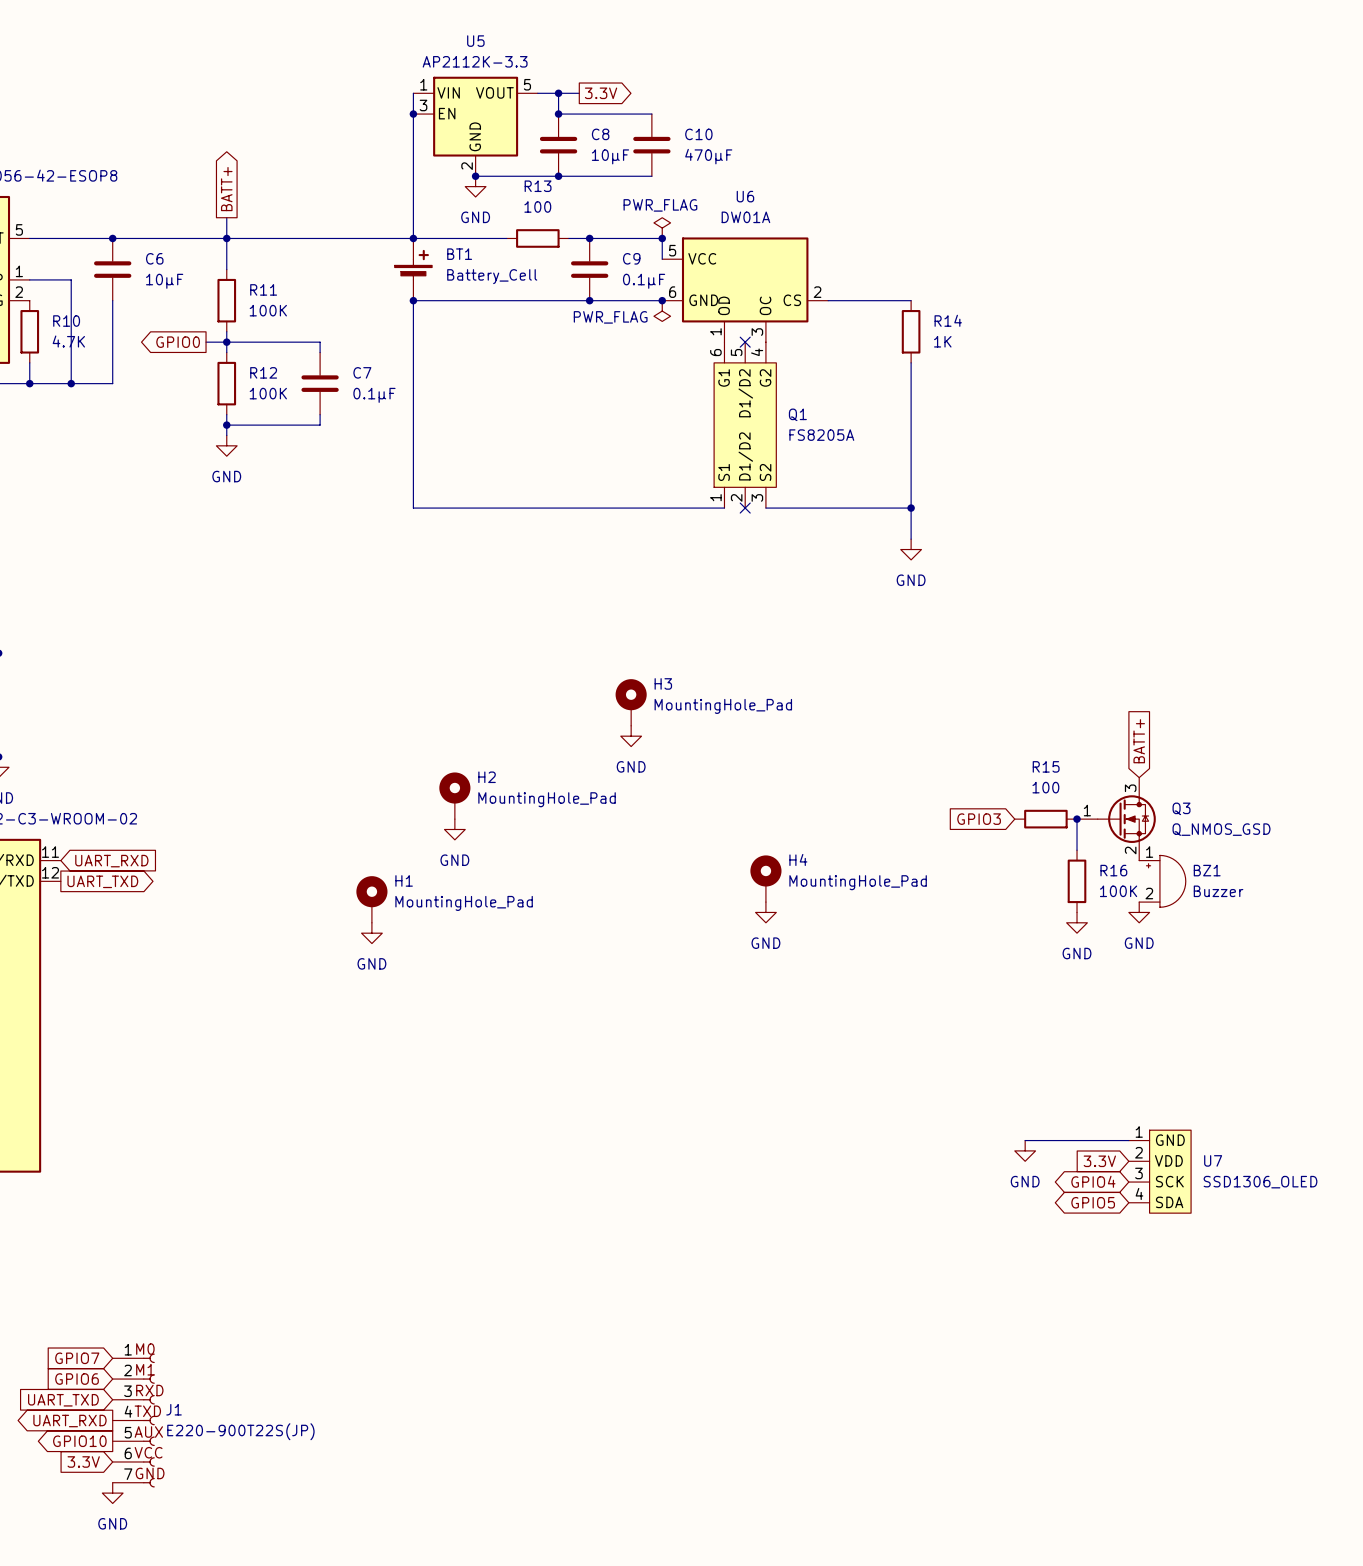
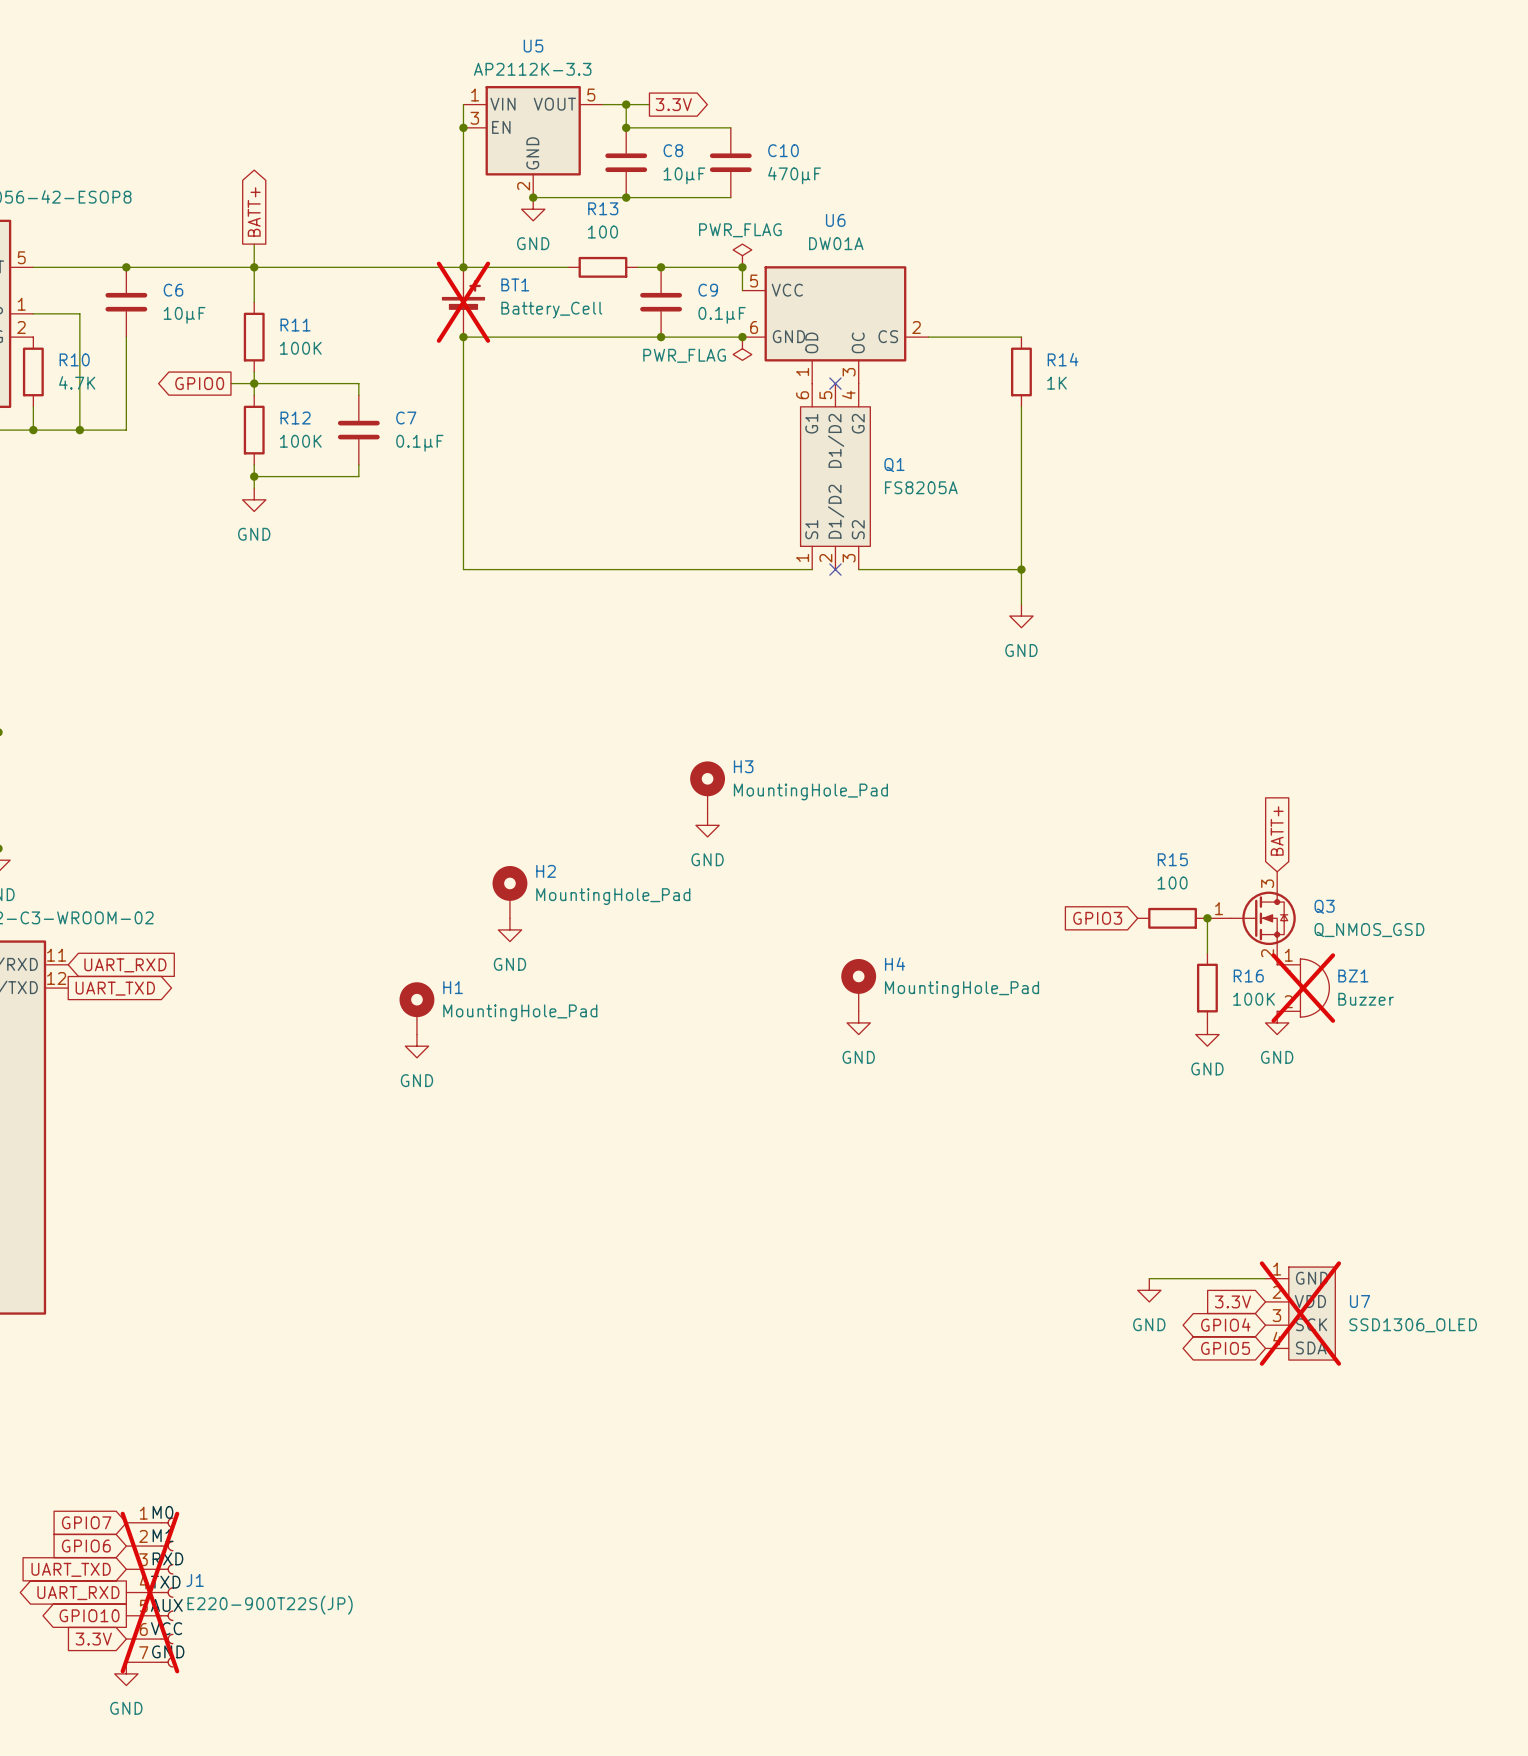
BT1 do-not-place cross: none -> (463, 302)
BZ1 do-not-place cross: none -> (1303, 988)
U7 do-not-place cross: none -> (1300, 1313)
J1 do-not-place cross: none -> (149, 1592)

